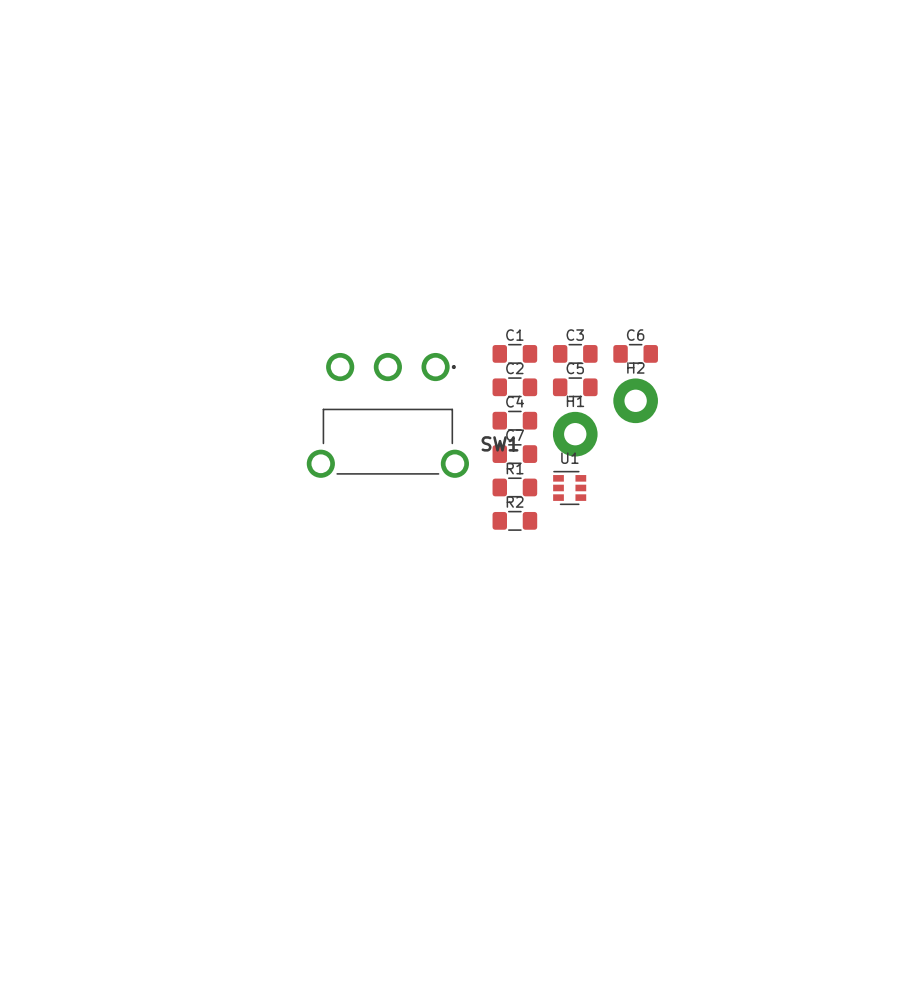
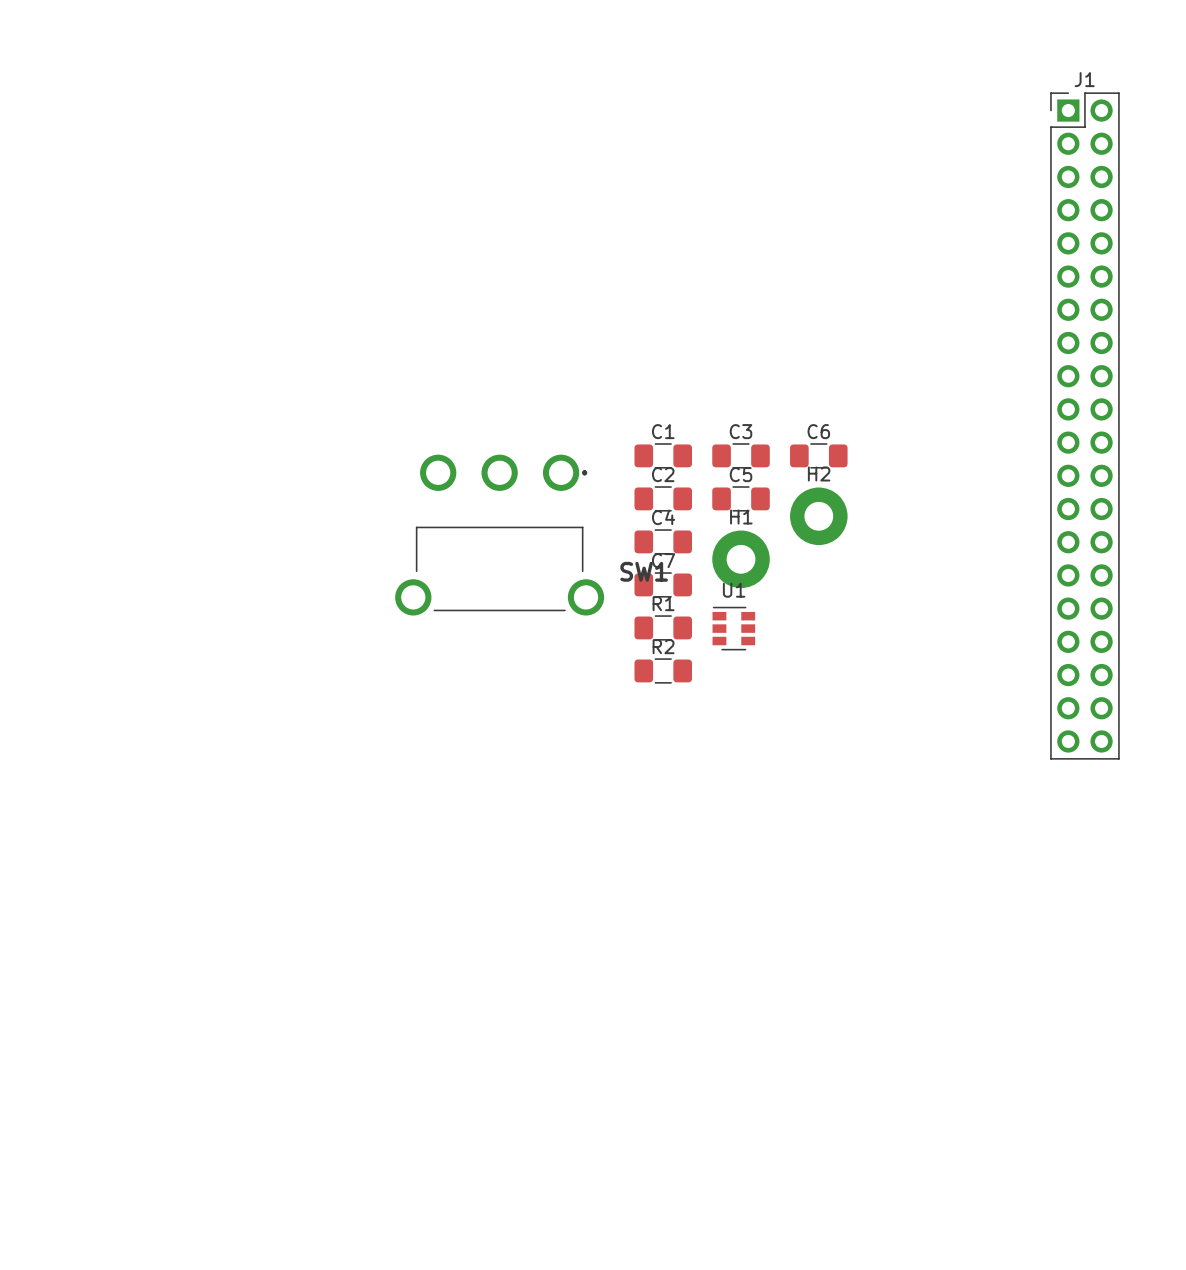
J1: none -> (1084, 426)

